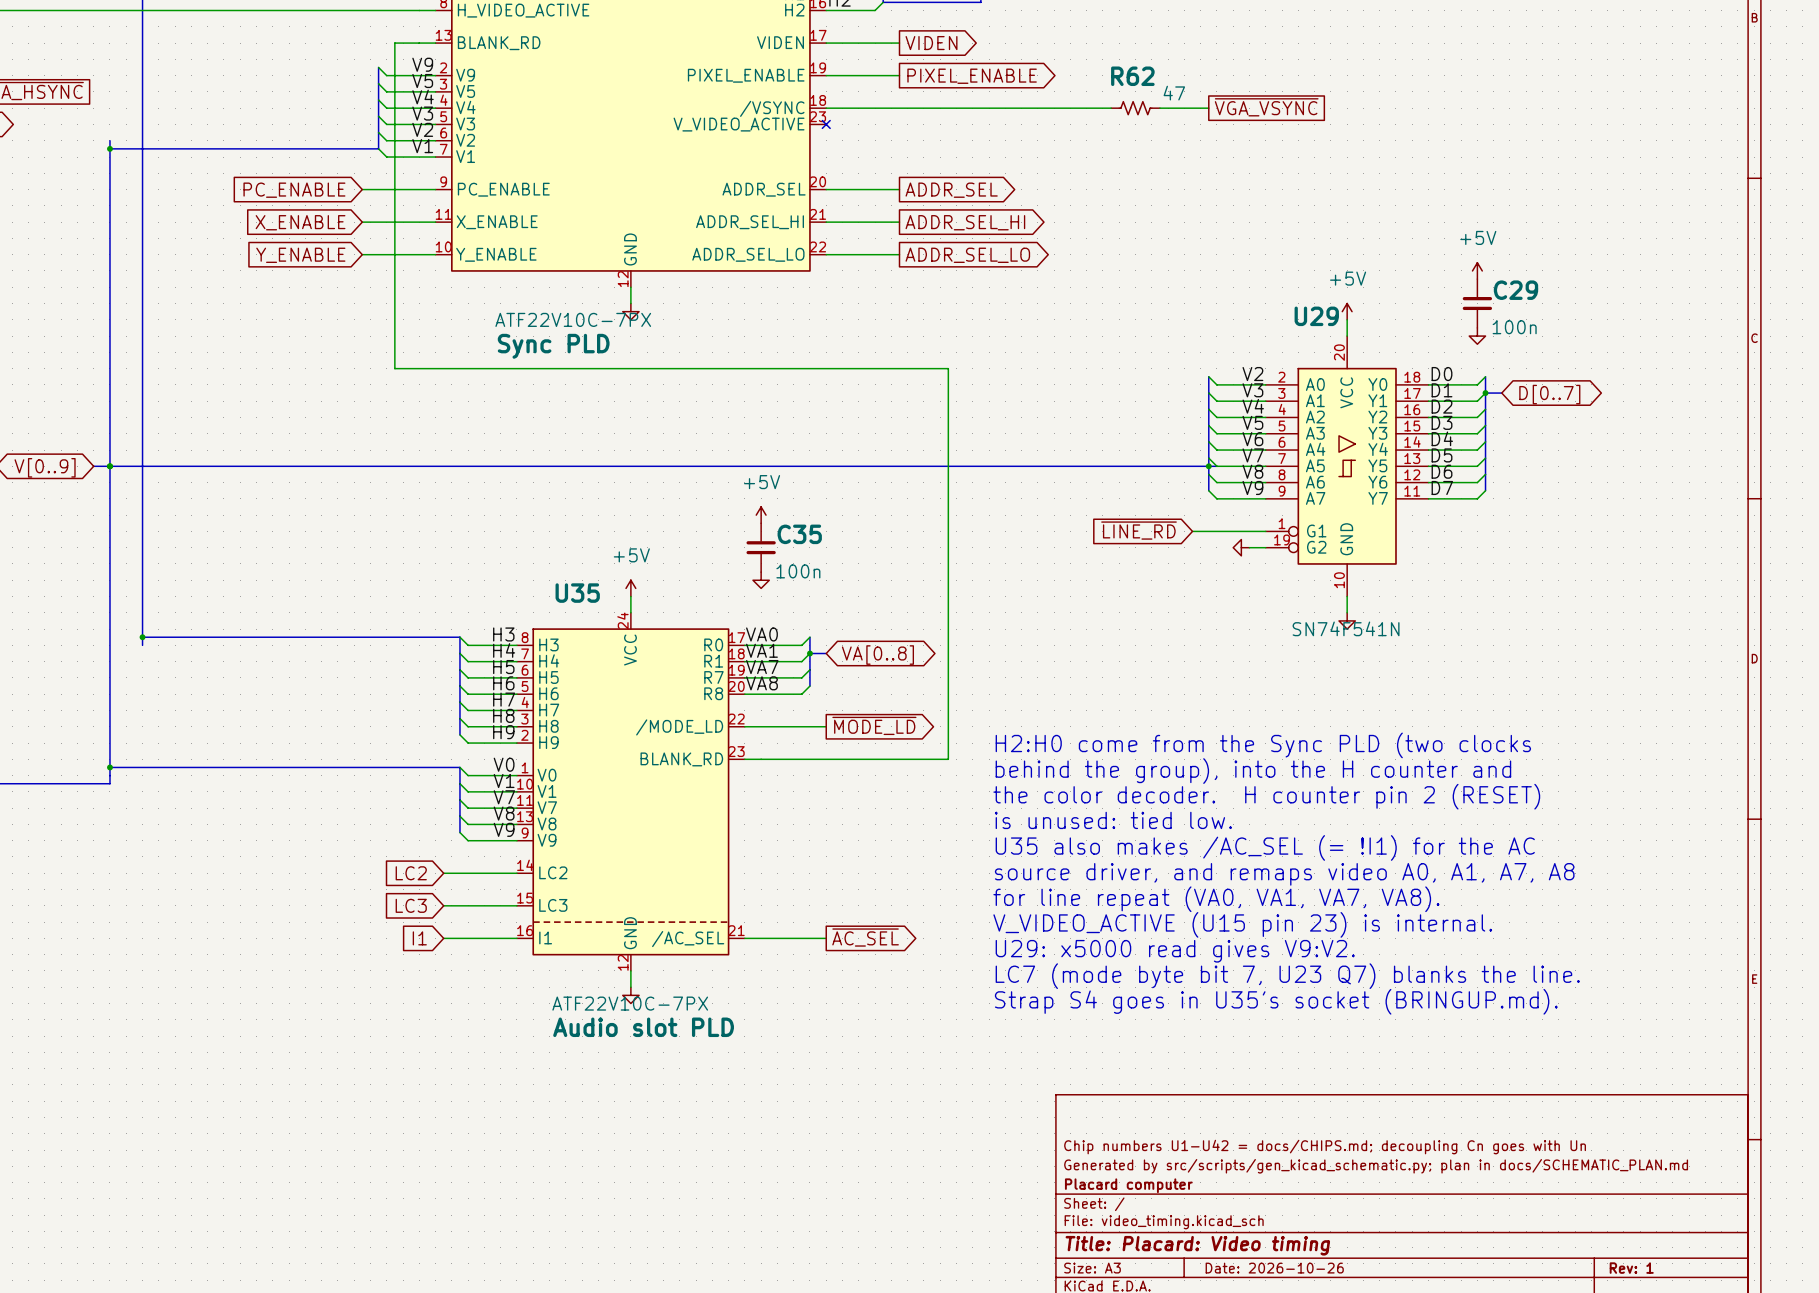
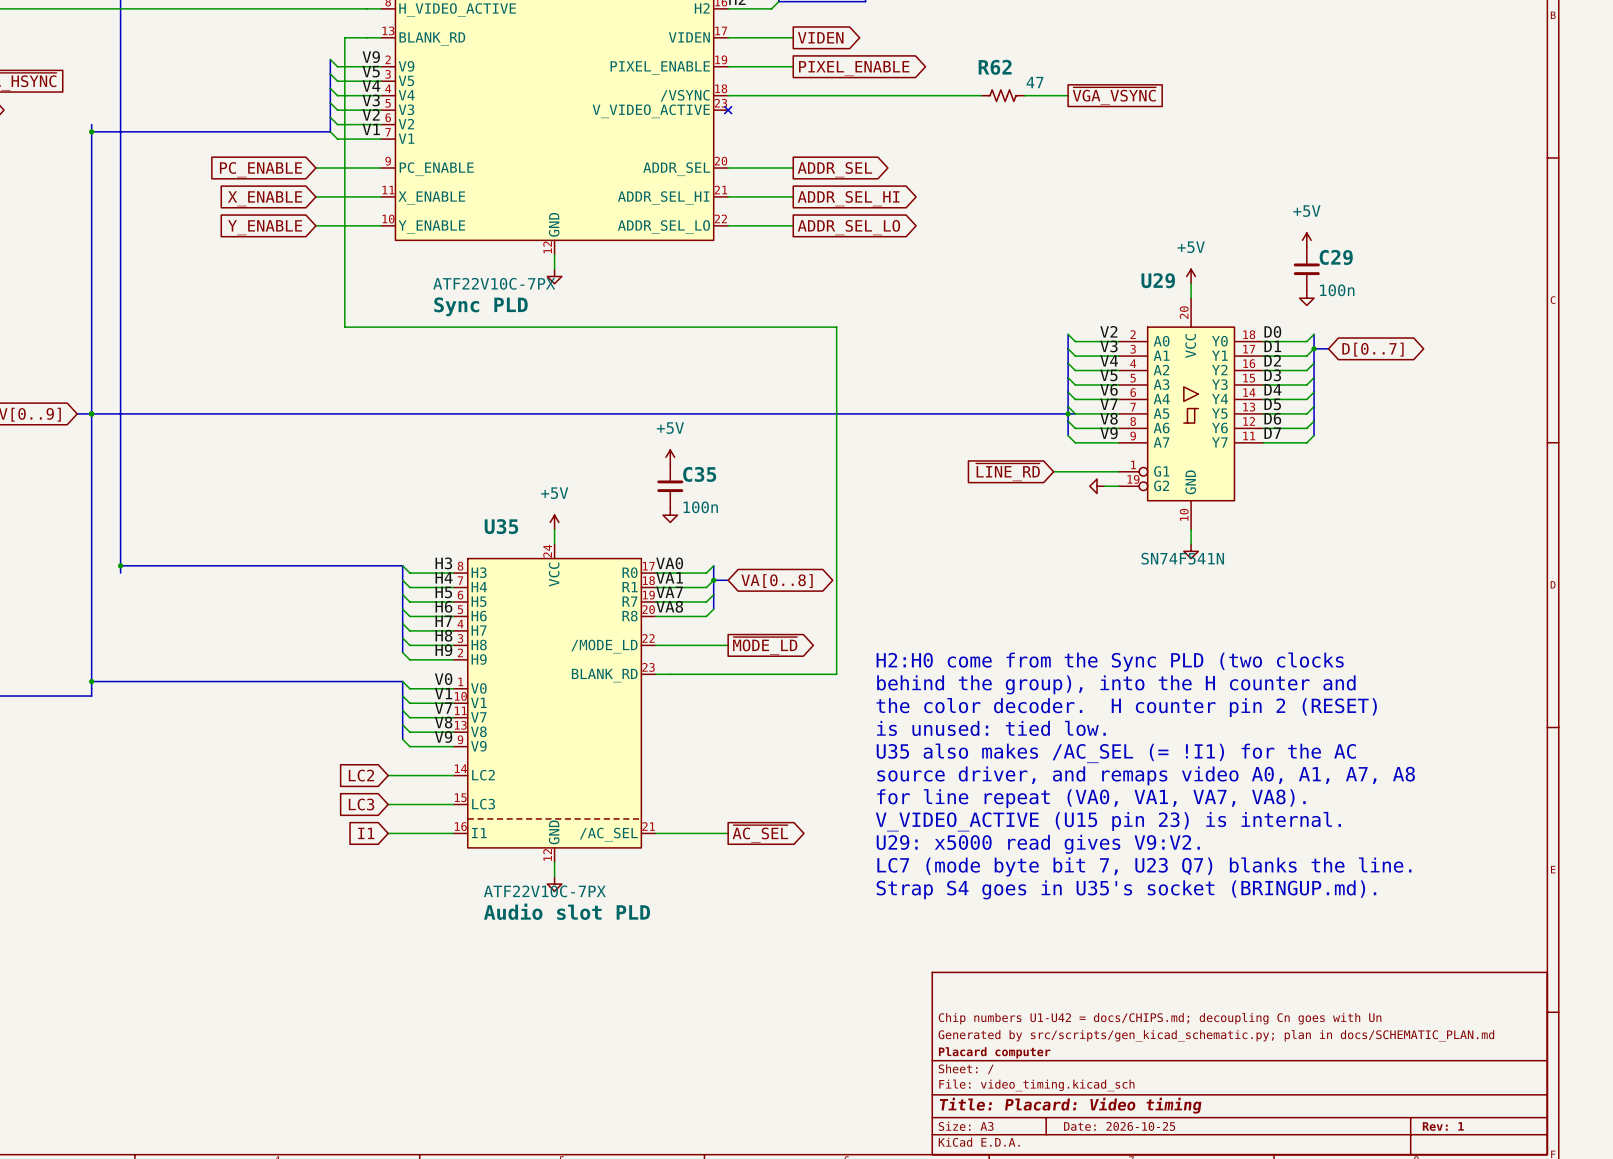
title block: Date: 2026-10-26 (1274, 1268) -> Date: 2026-10-25 (1119, 1126)

